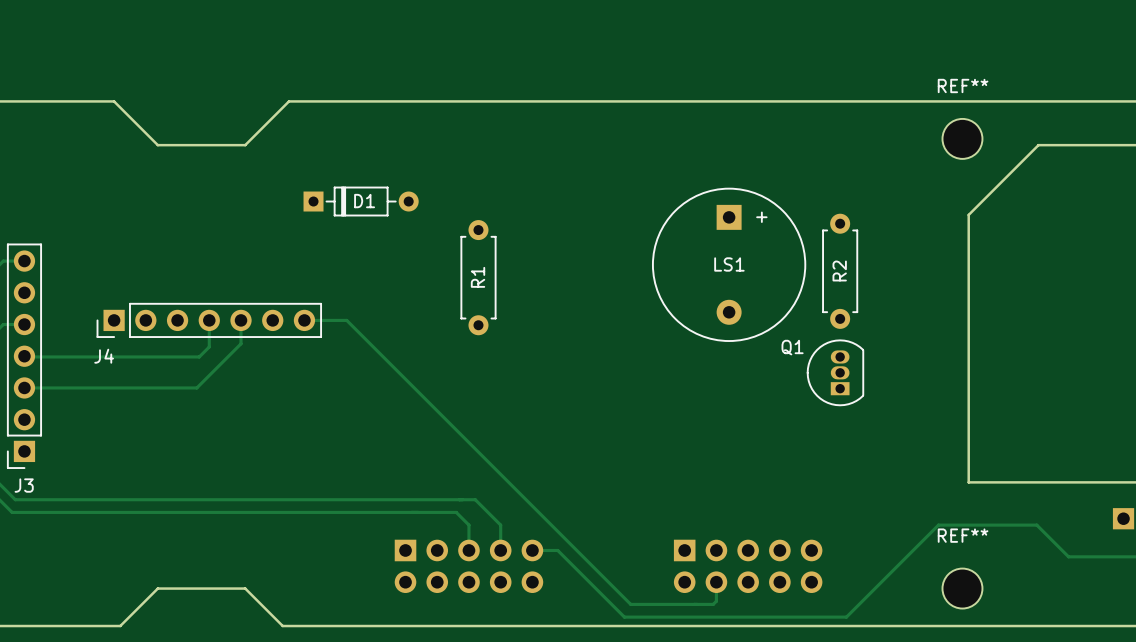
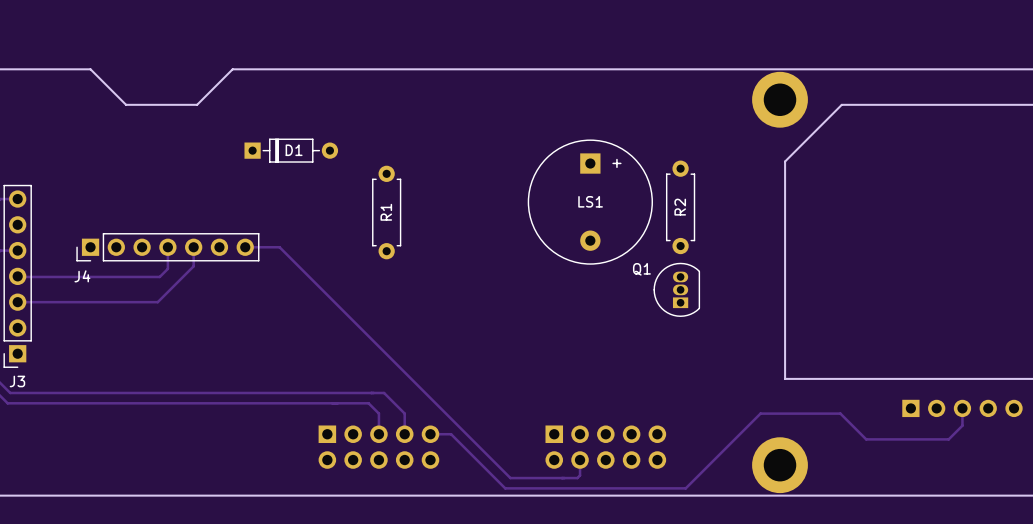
REF**: (962, 138) -> none
part: none -> (780, 99)
REF**: (962, 588) -> none
part: none -> (780, 465)
board edge: (120, 626) (157, 588) (245, 588) (282, 626) -> (95, 495) (227, 495)

